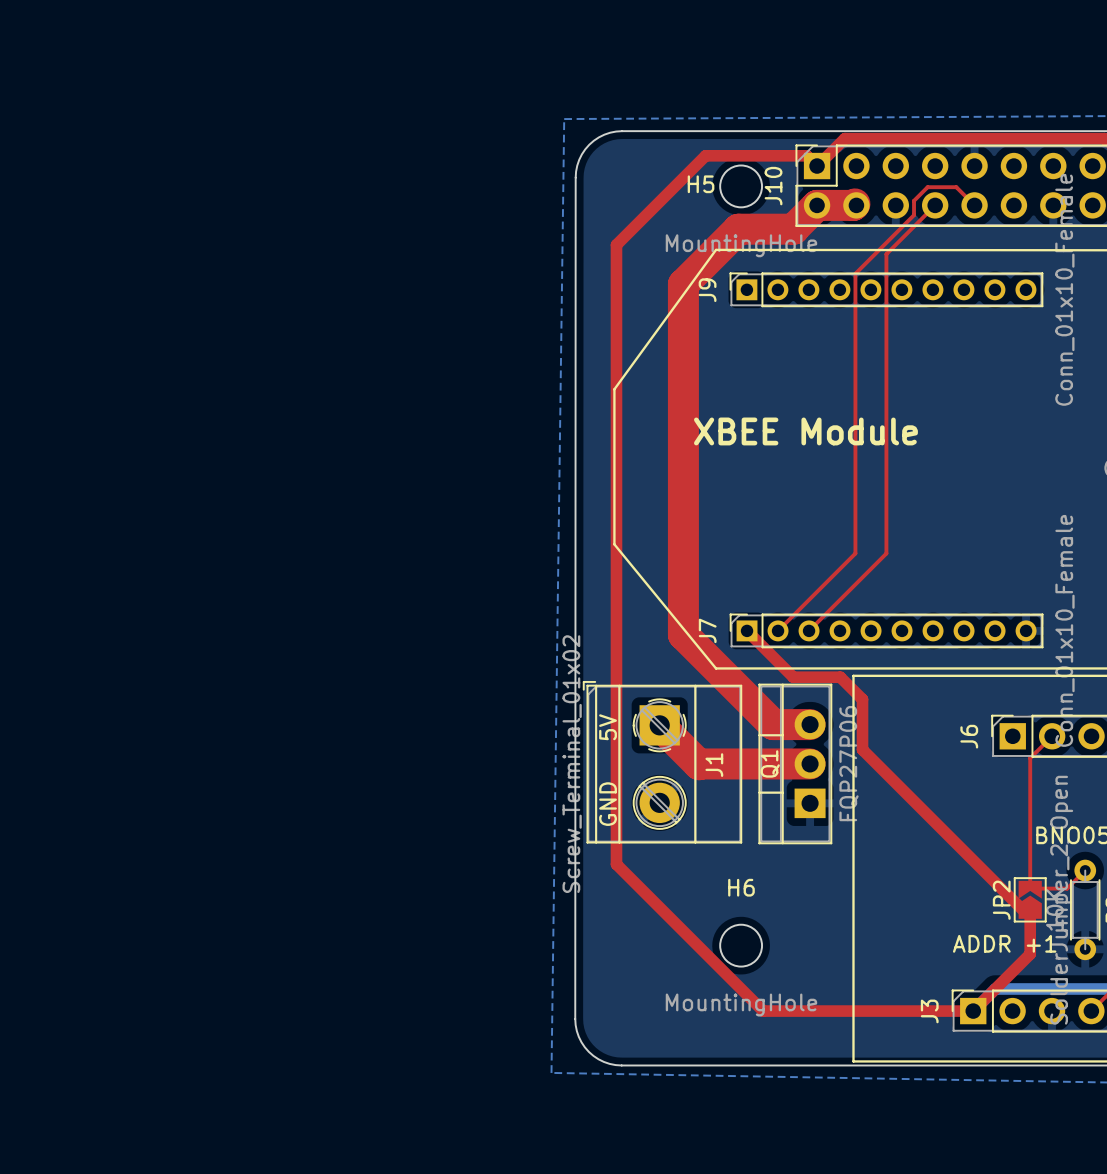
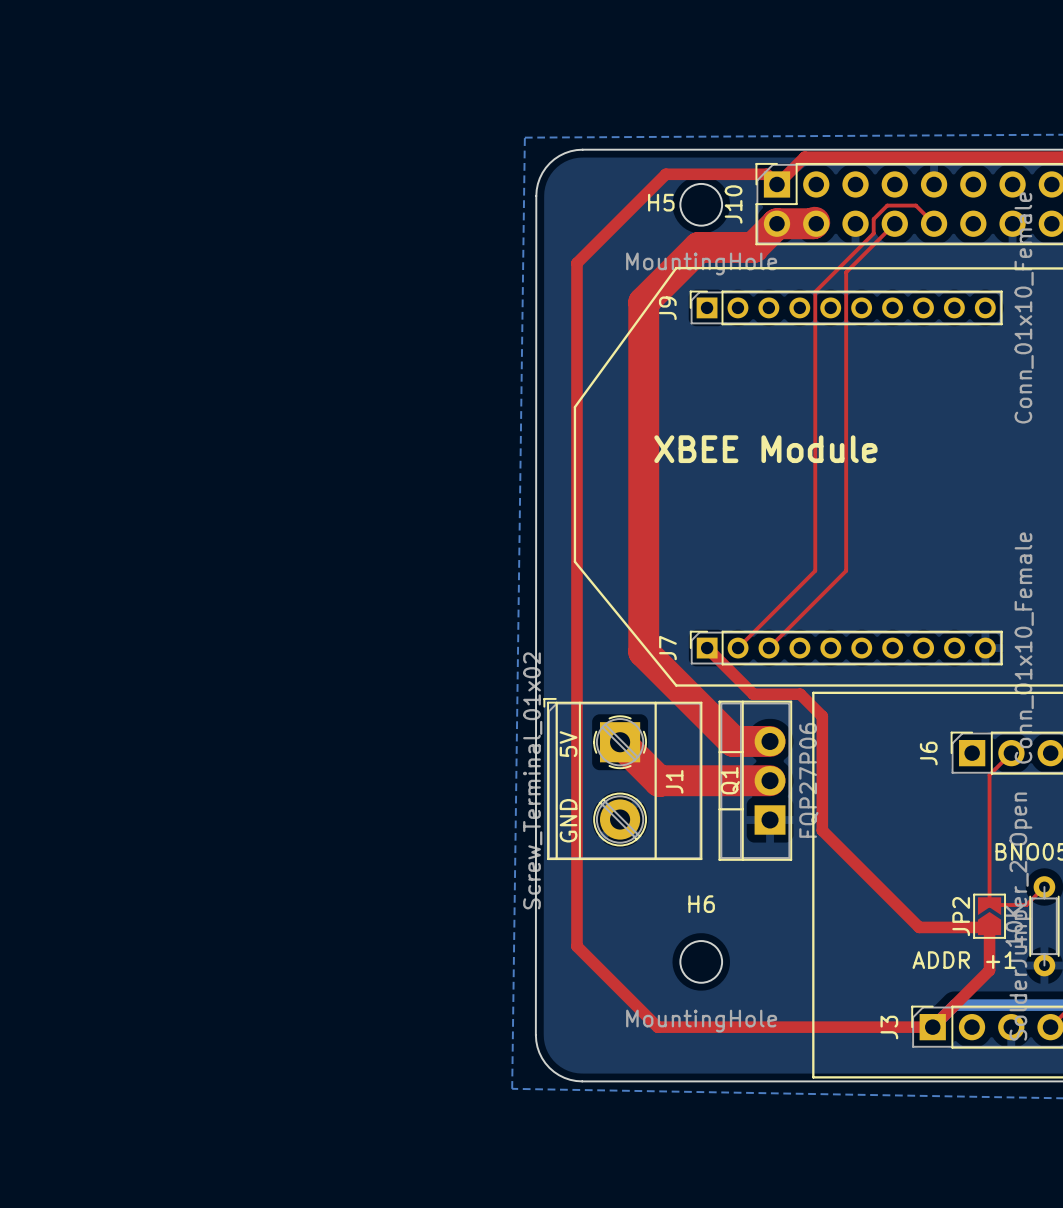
top track: (862, 749) (1023, 911) -> (822, 766) (822, 830) (919, 927) (989, 927)
top track: (616, 864) (763, 1011) -> (576, 880) (576, 946) (657, 1027) (723, 1027)

